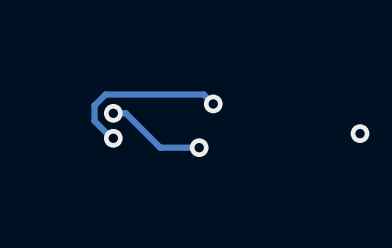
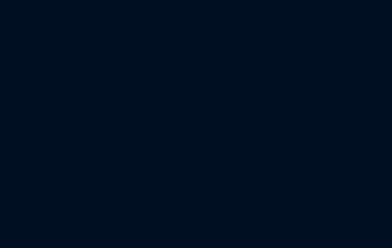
track: (213, 103) (203, 94) (105, 94) (94, 105) (94, 121) (113, 138) -> none
via: (213, 103) -> none
track: (113, 113) (125, 113) (160, 147) (199, 147) -> none
via: (113, 113) -> none
via: (360, 133) -> none
via: (113, 138) -> none
via: (199, 147) -> none

